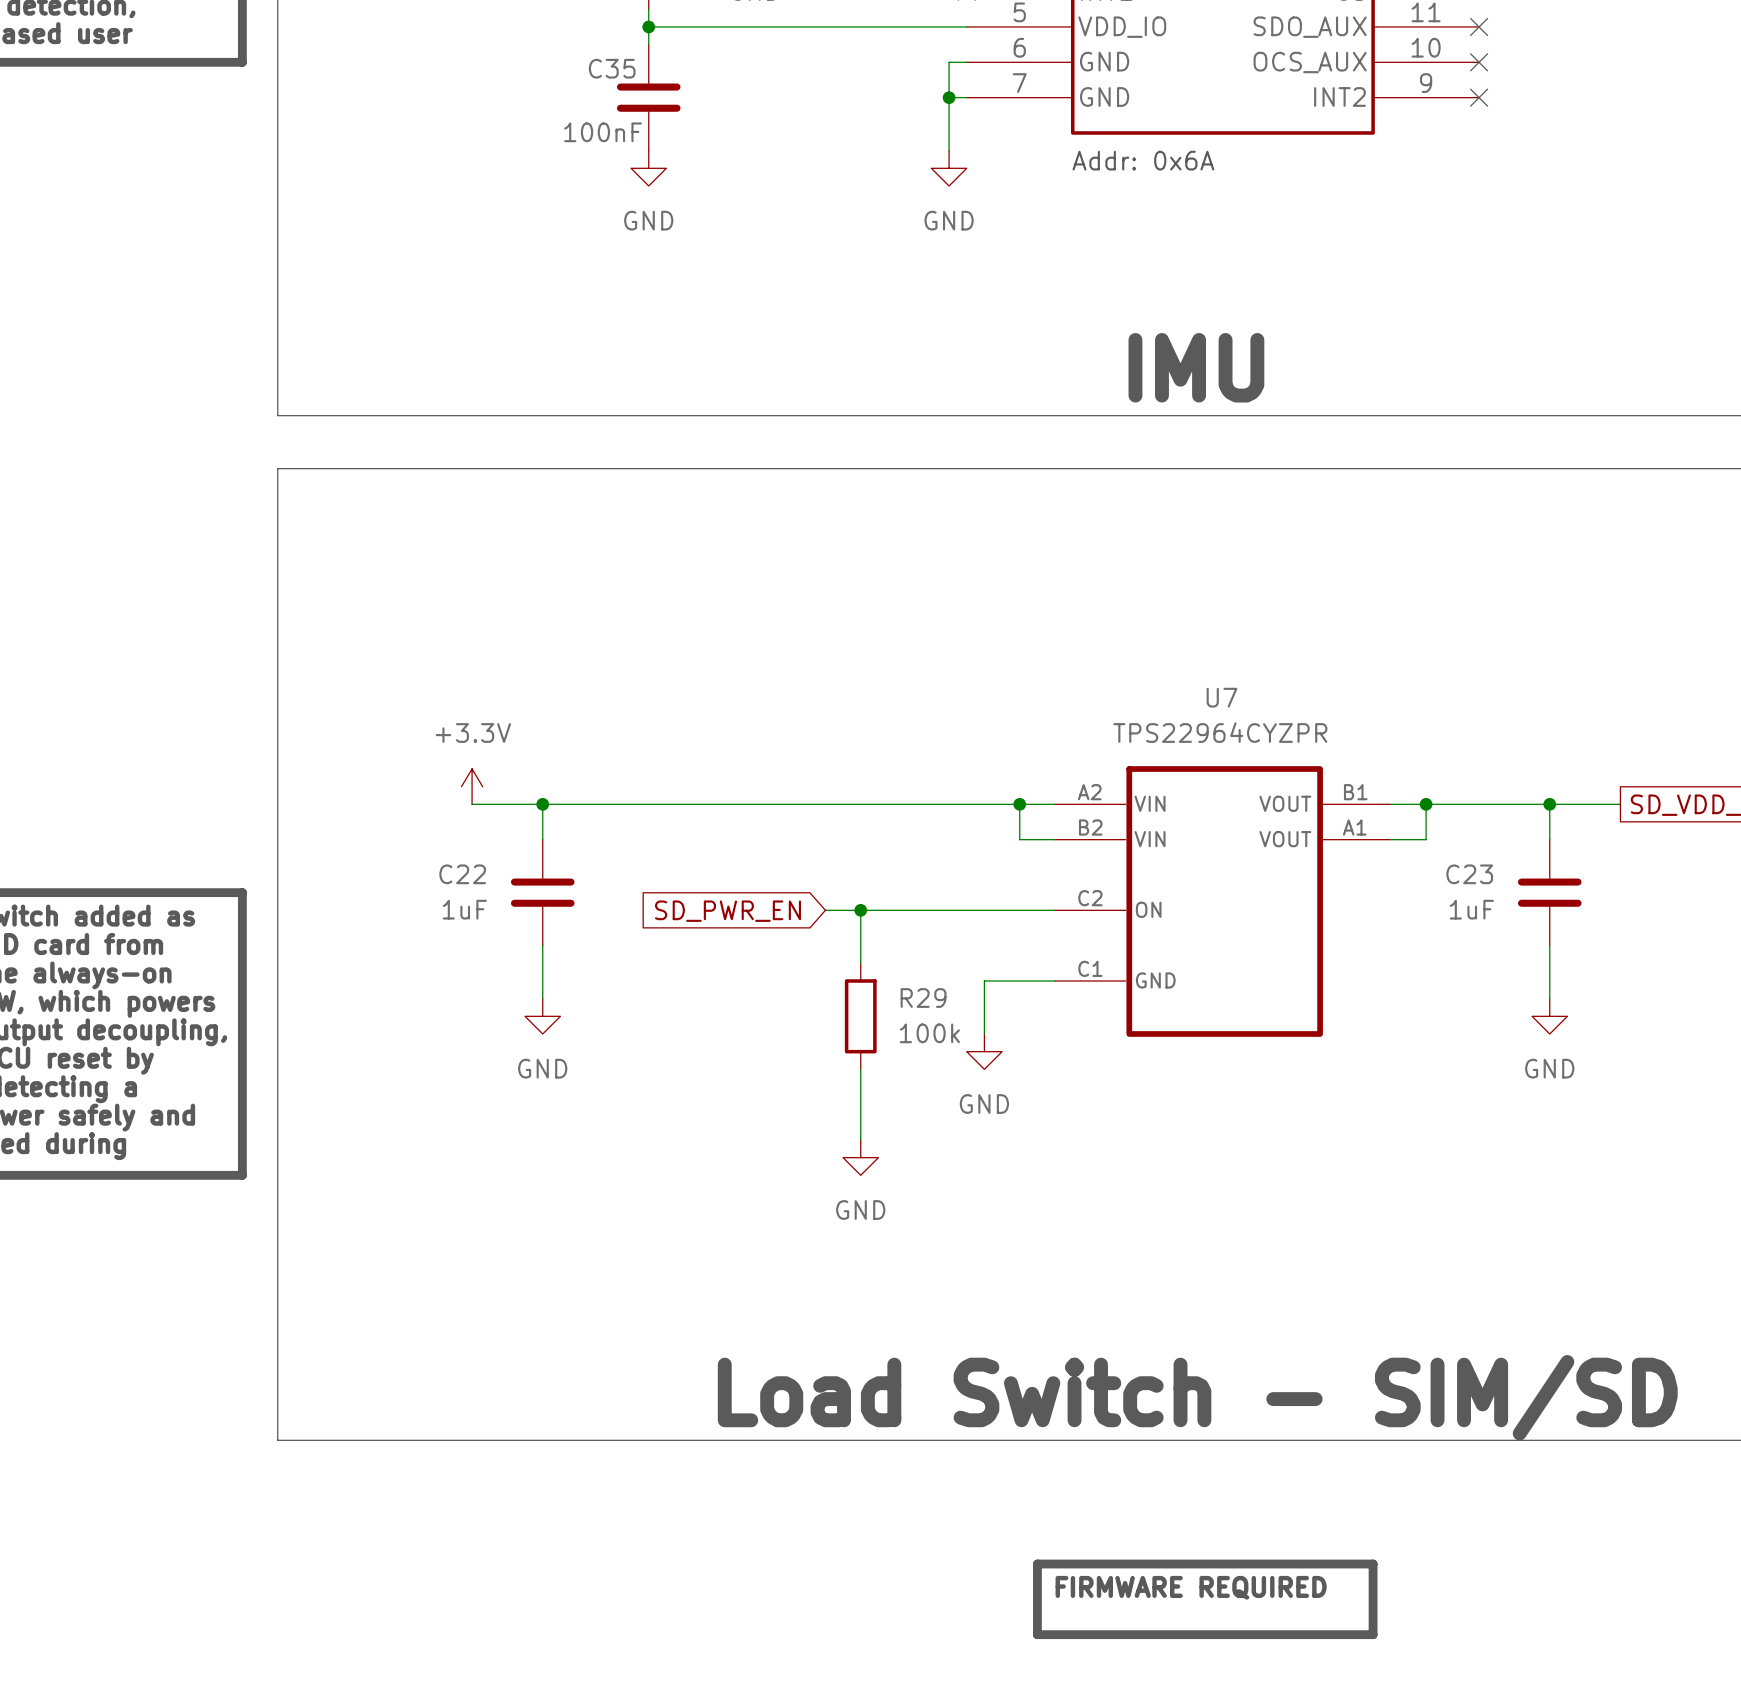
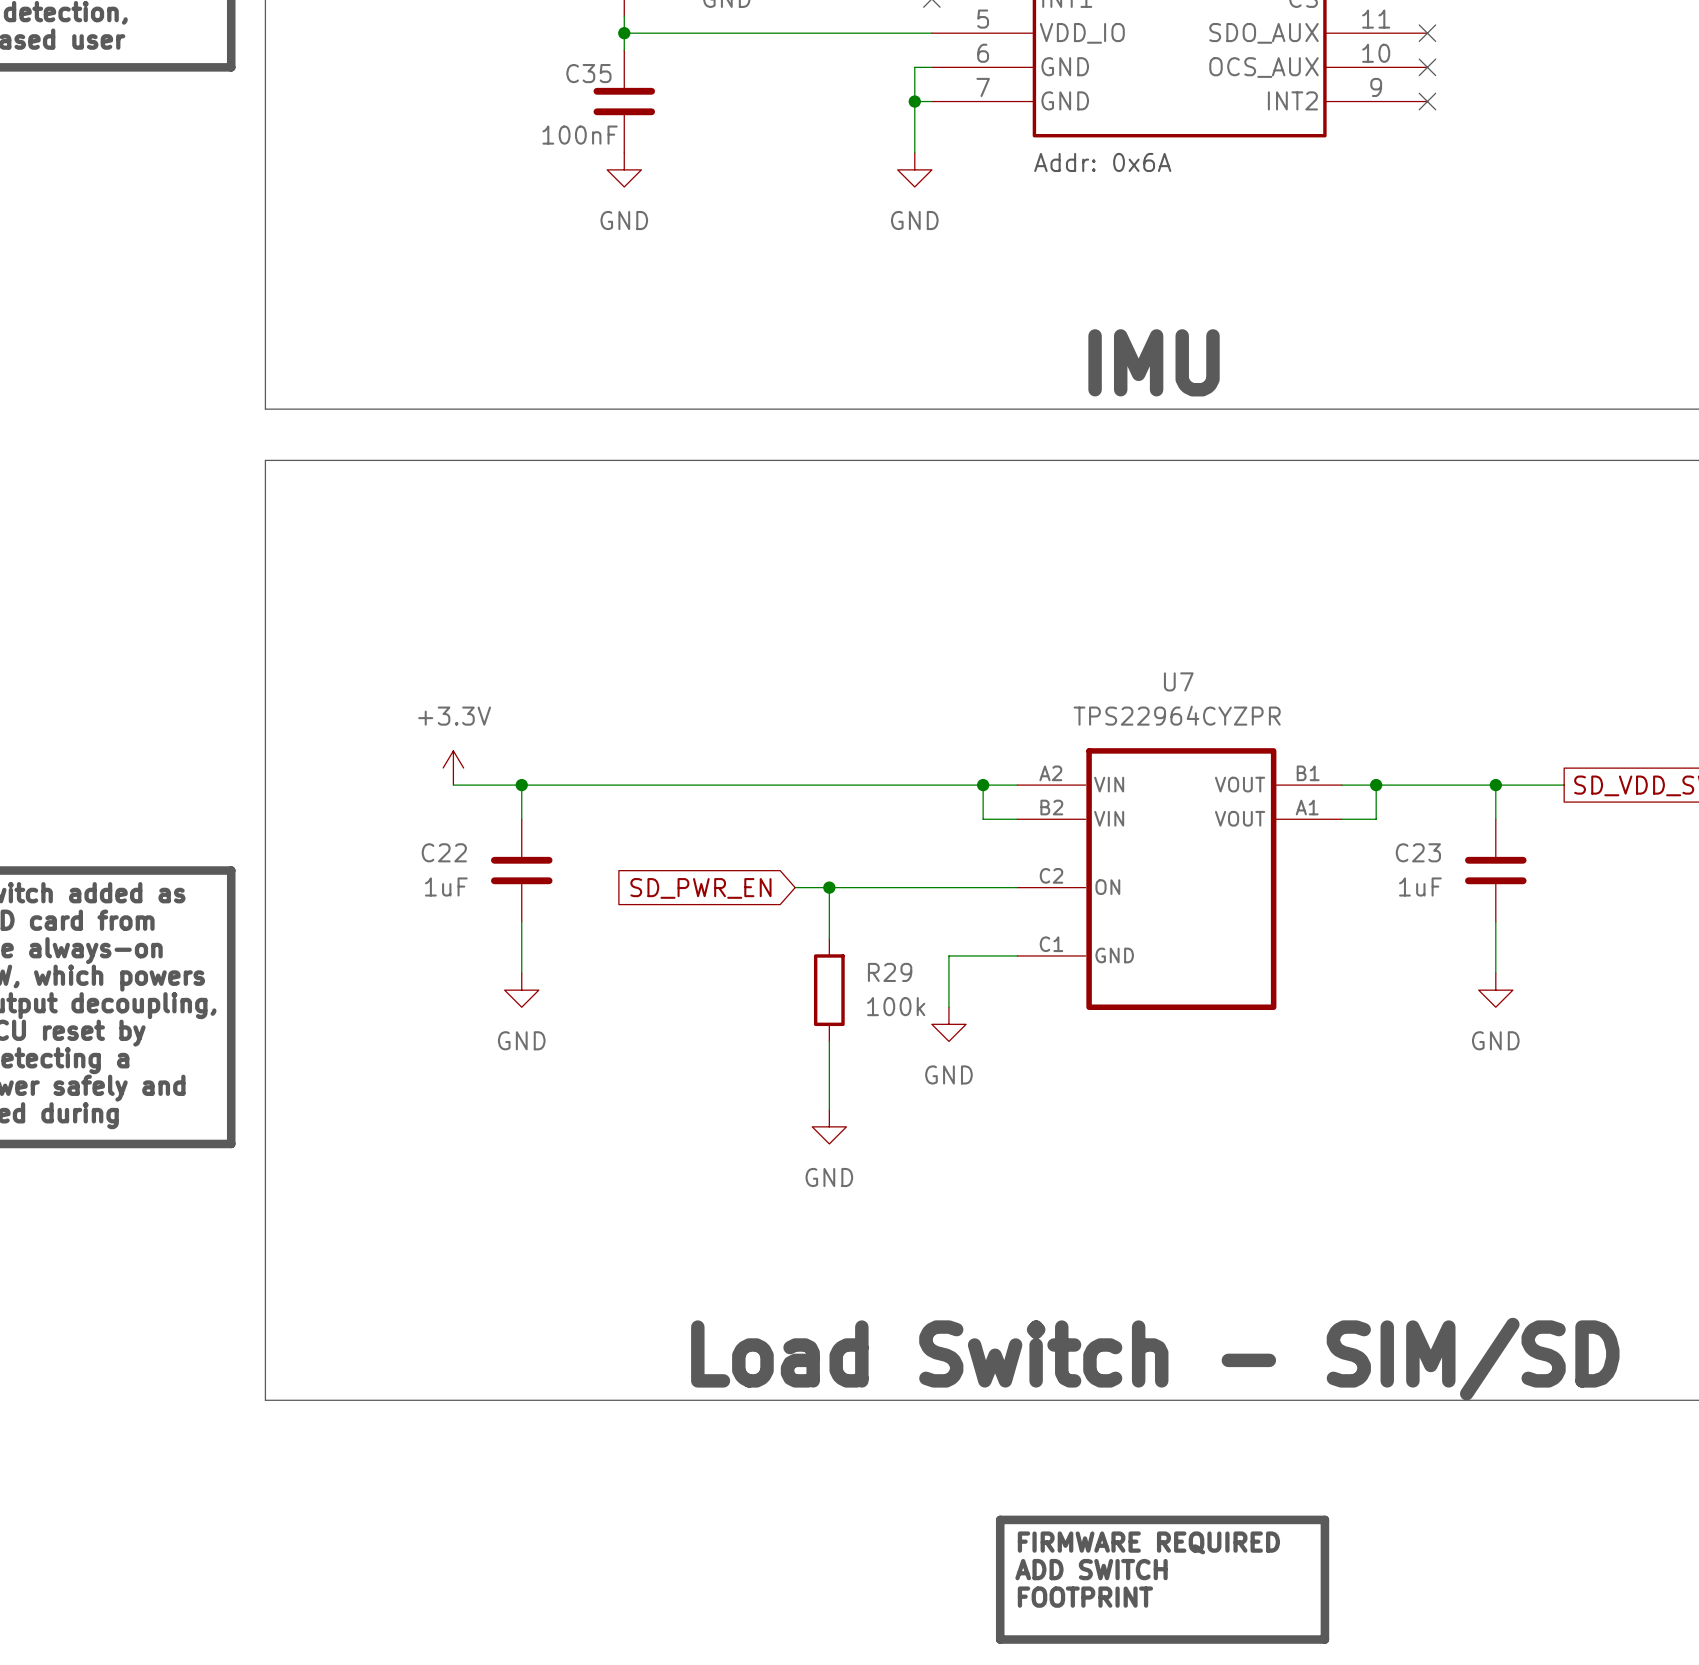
text: none -> ADD SWITCH (1091, 1569)
line: (1037, 1634) (1373, 1634) -> (1000, 1588) (1000, 1639) (1324, 1639) (1324, 1588)
text: none -> FOOTPRINT (1085, 1597)

